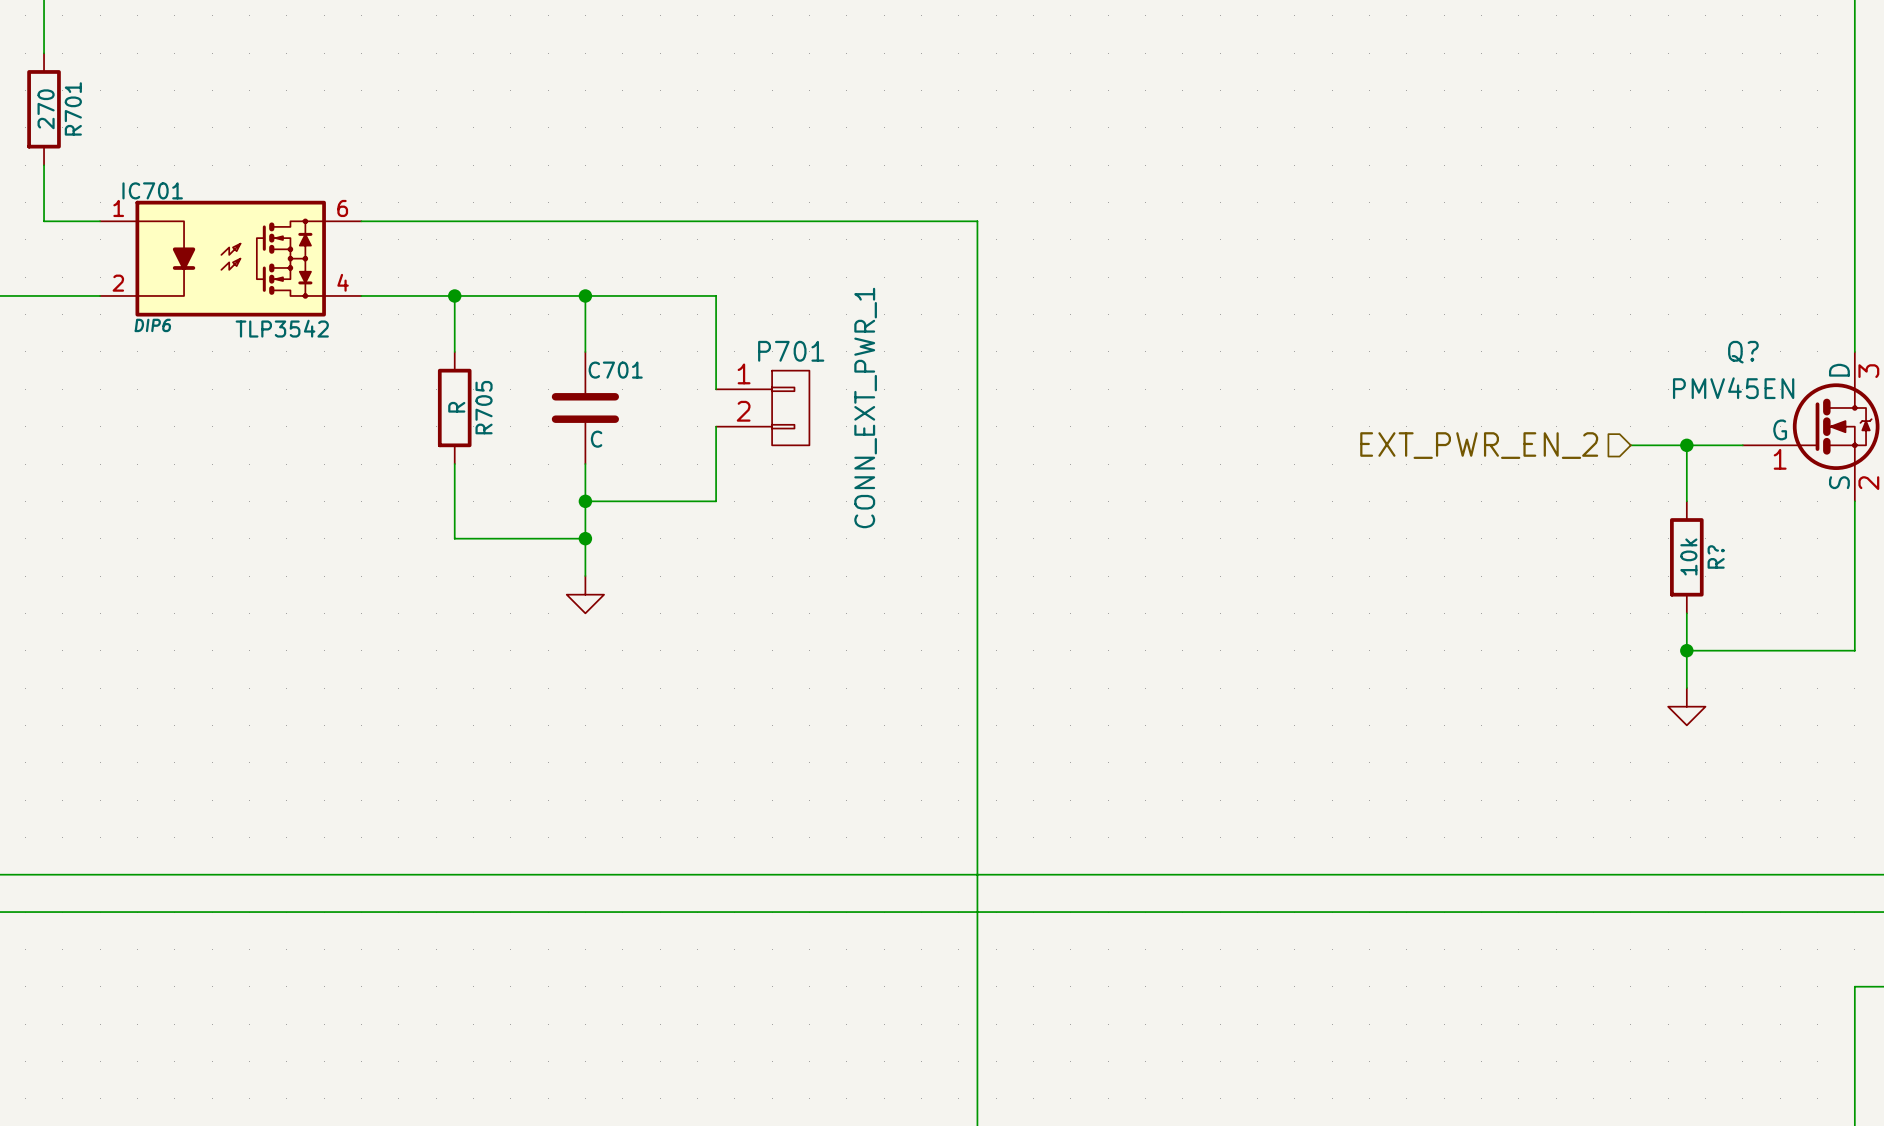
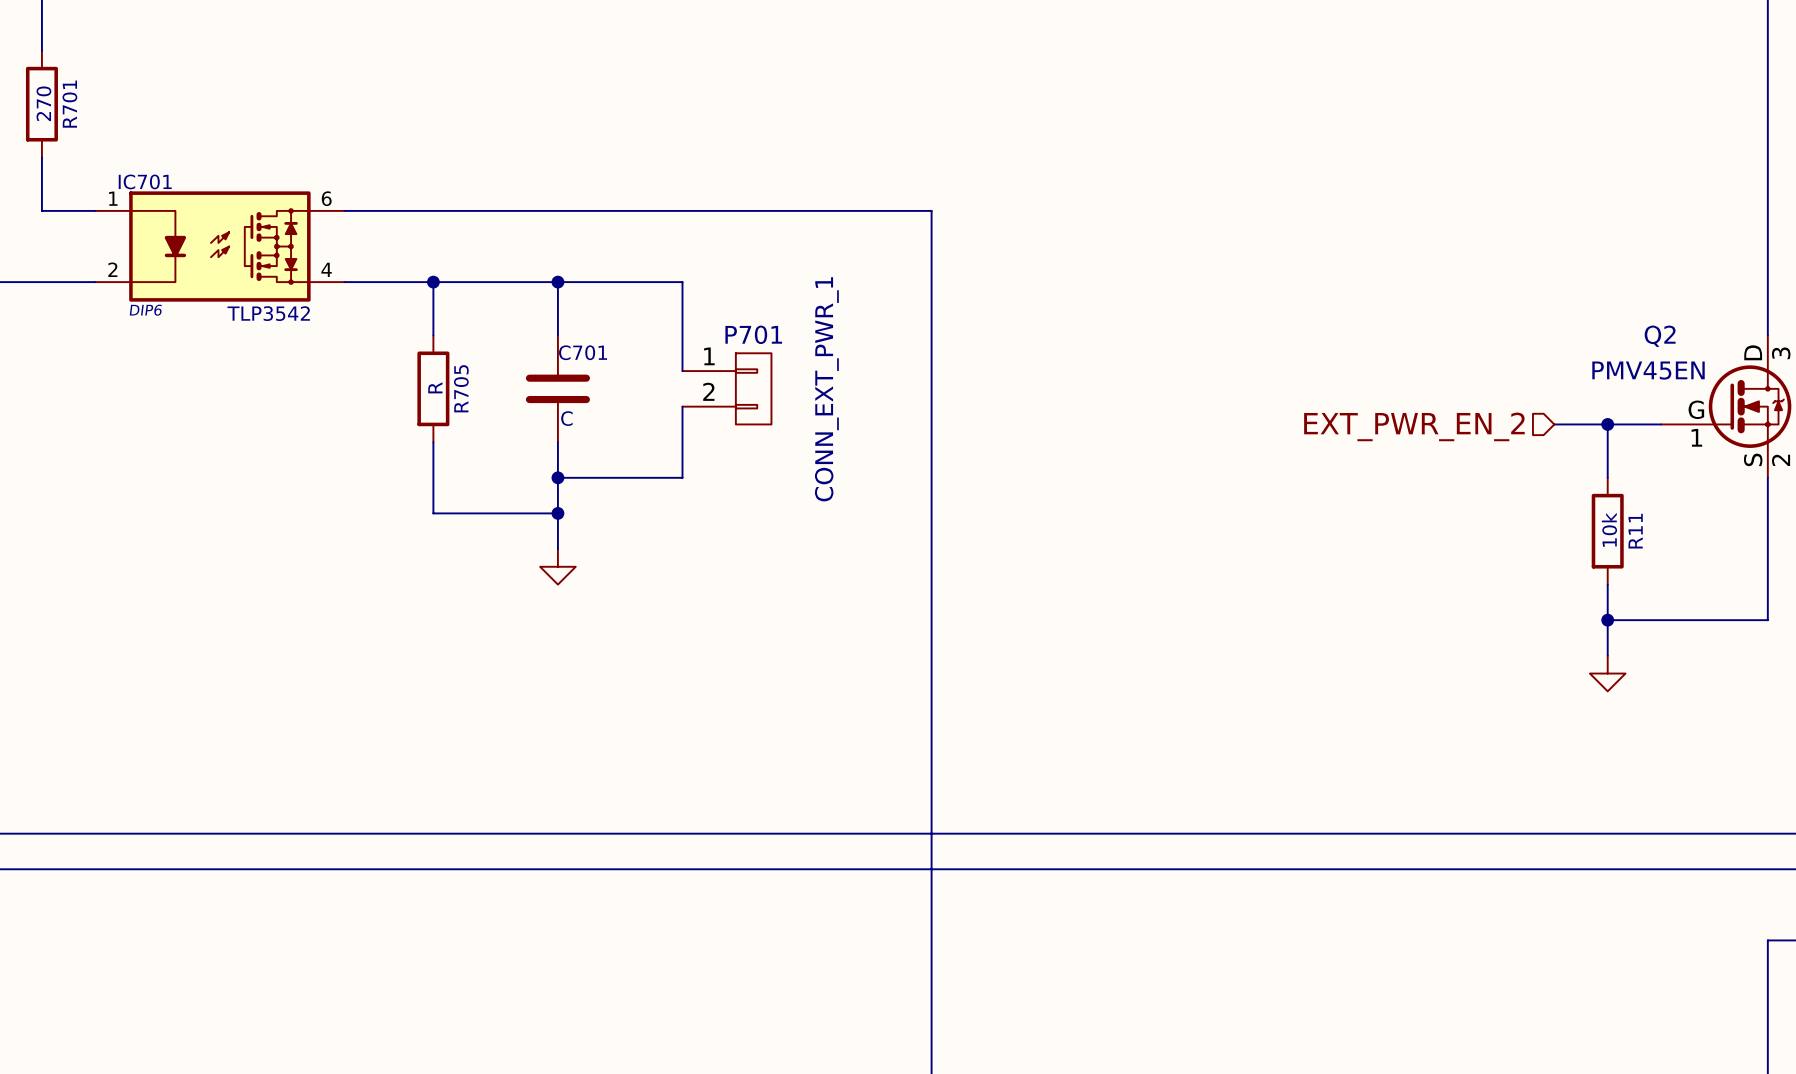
Q? name: Q? (1743, 352) -> Q2 (1660, 336)
R? name: R? (1716, 556) -> R11 (1635, 531)

